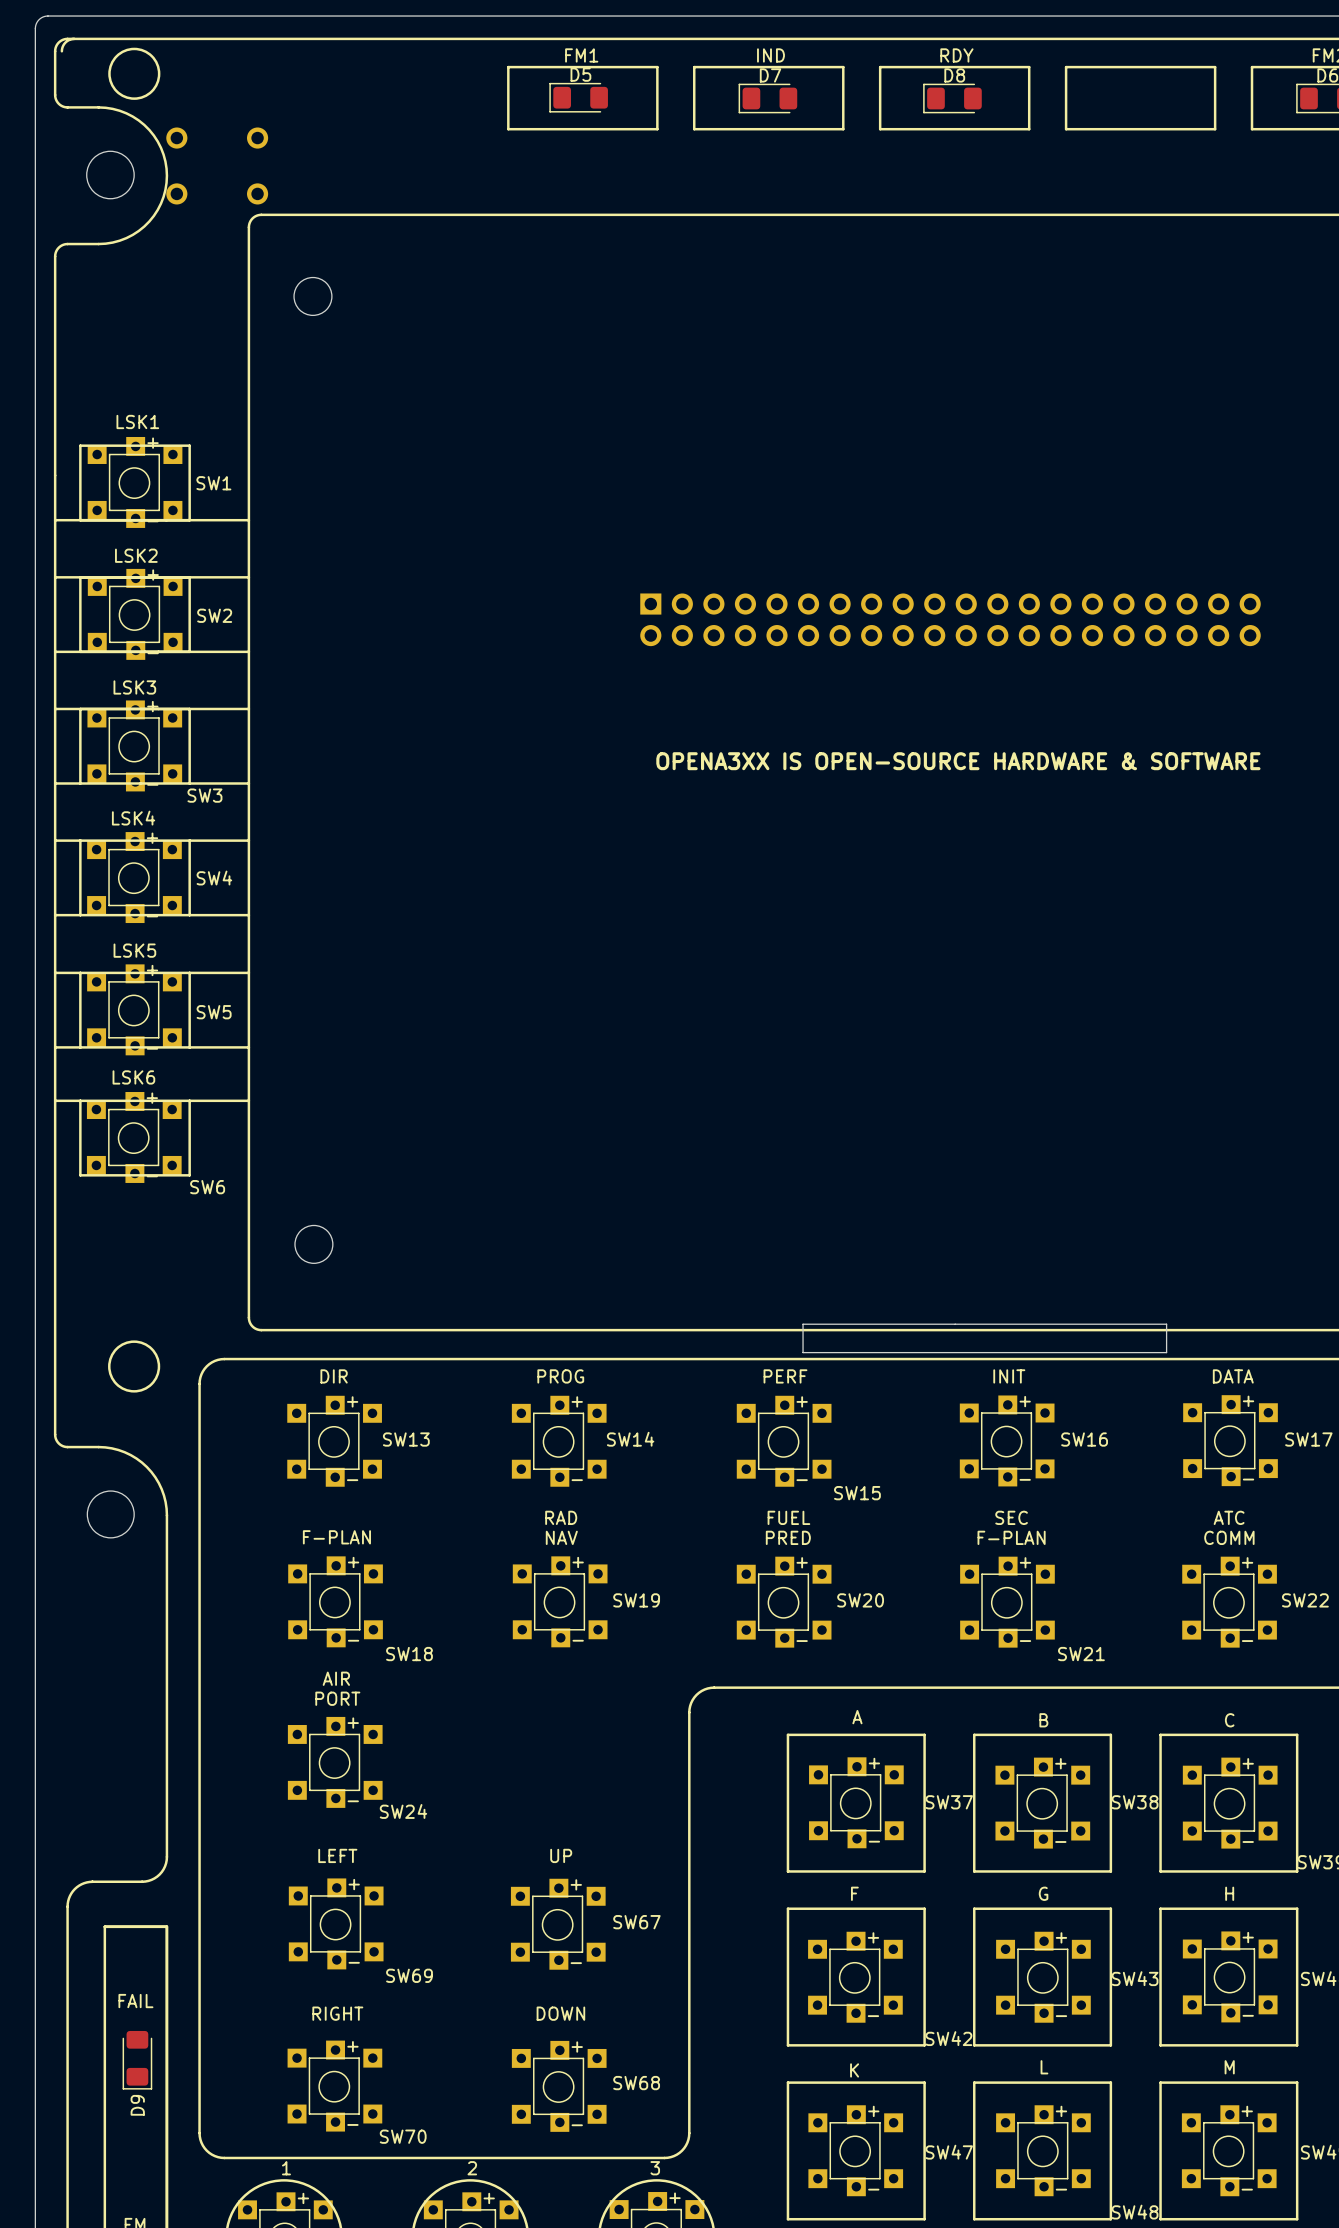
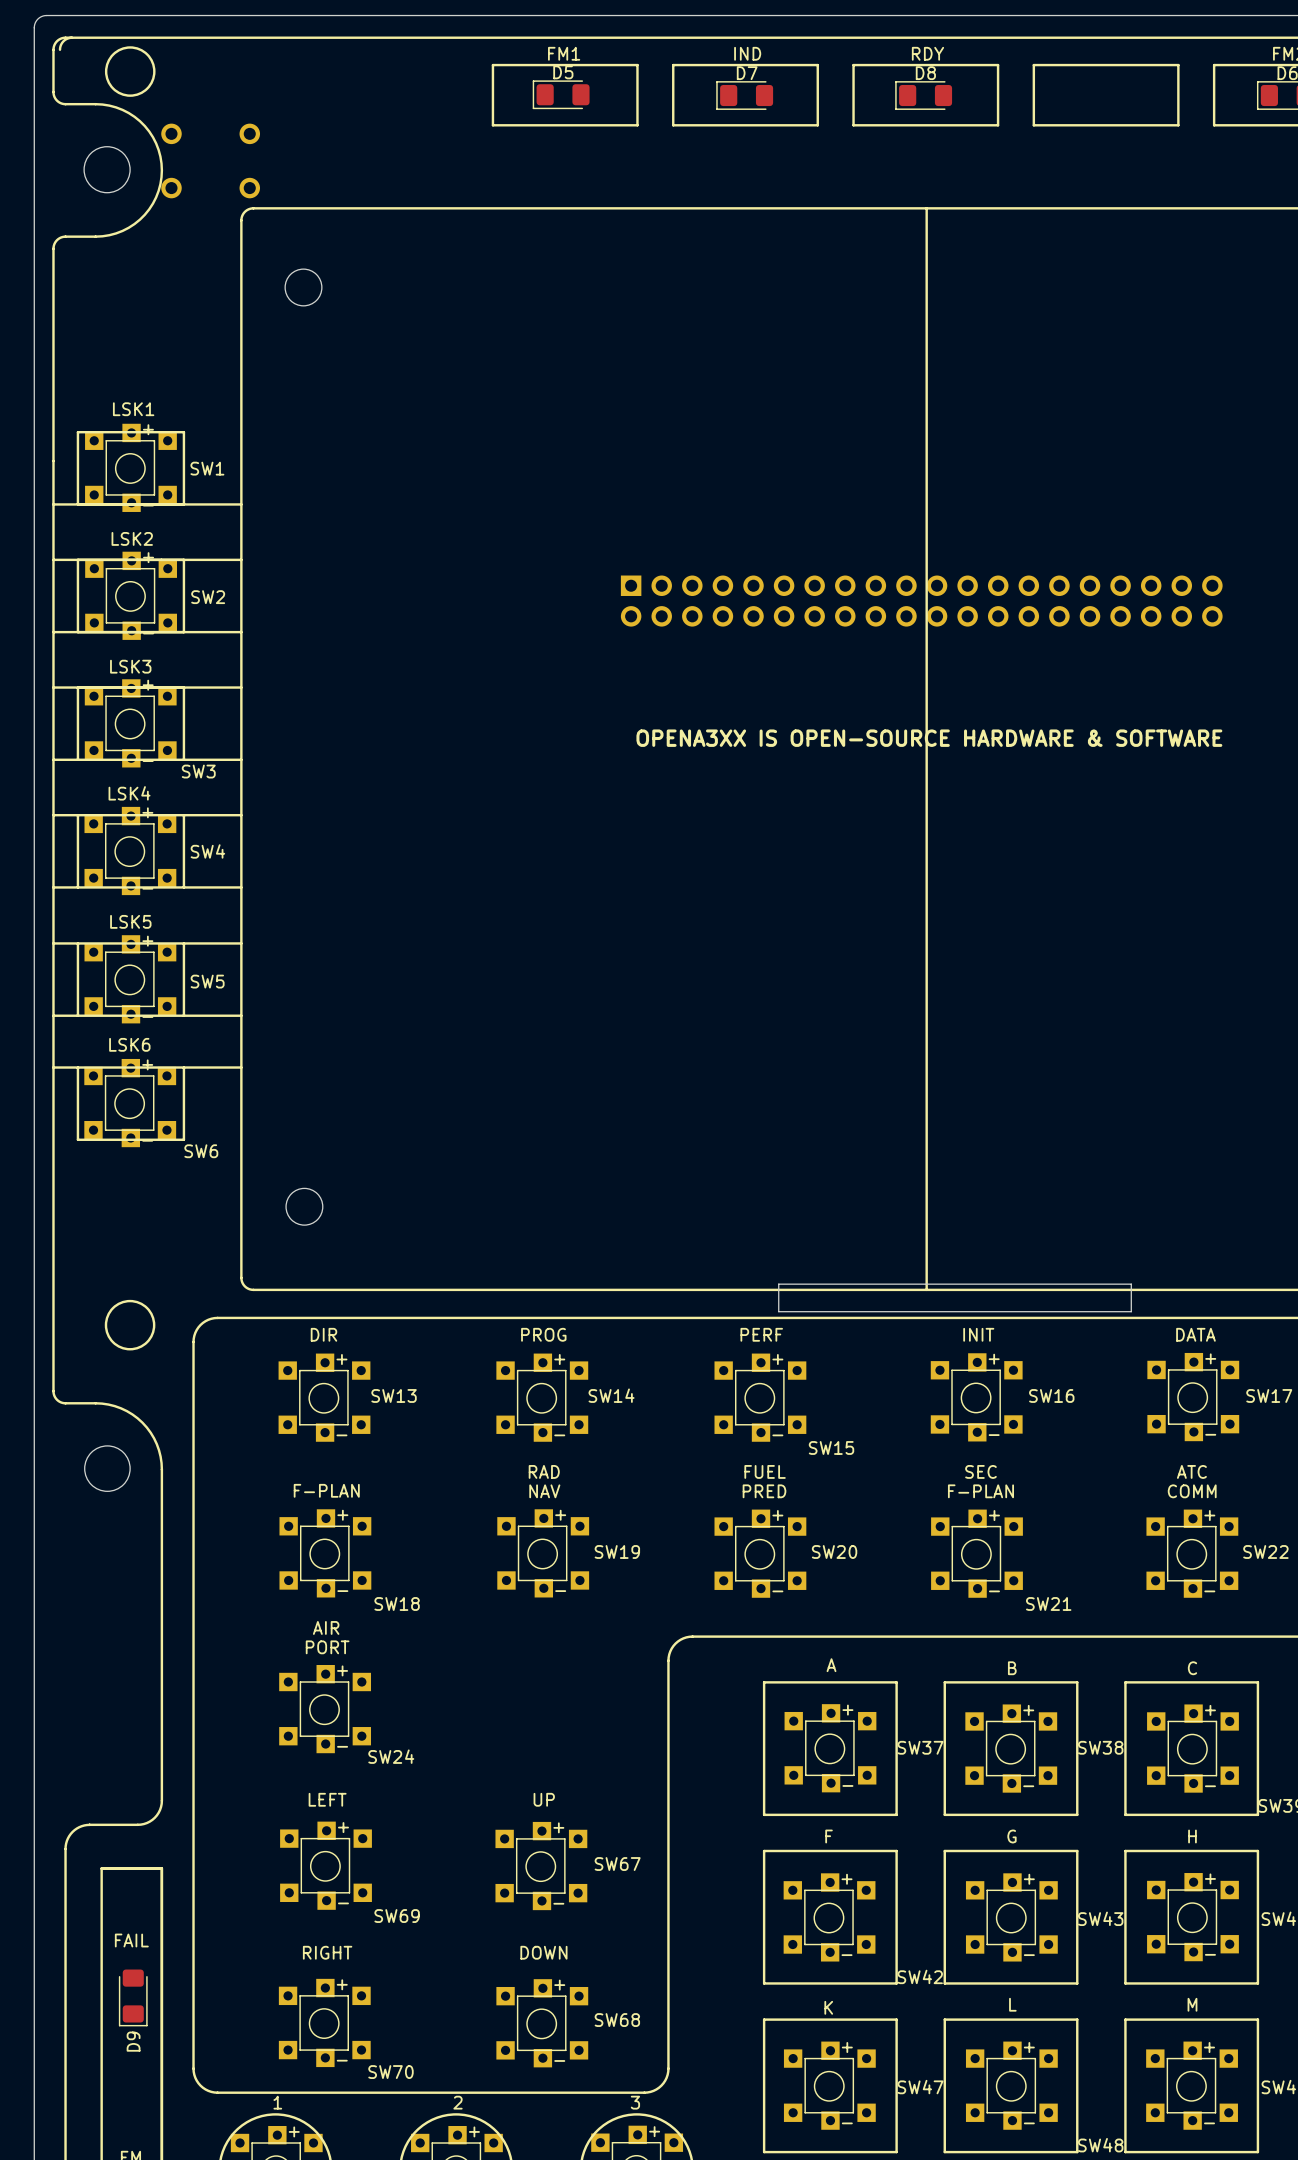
line: none -> (926, 208) (926, 1289)

